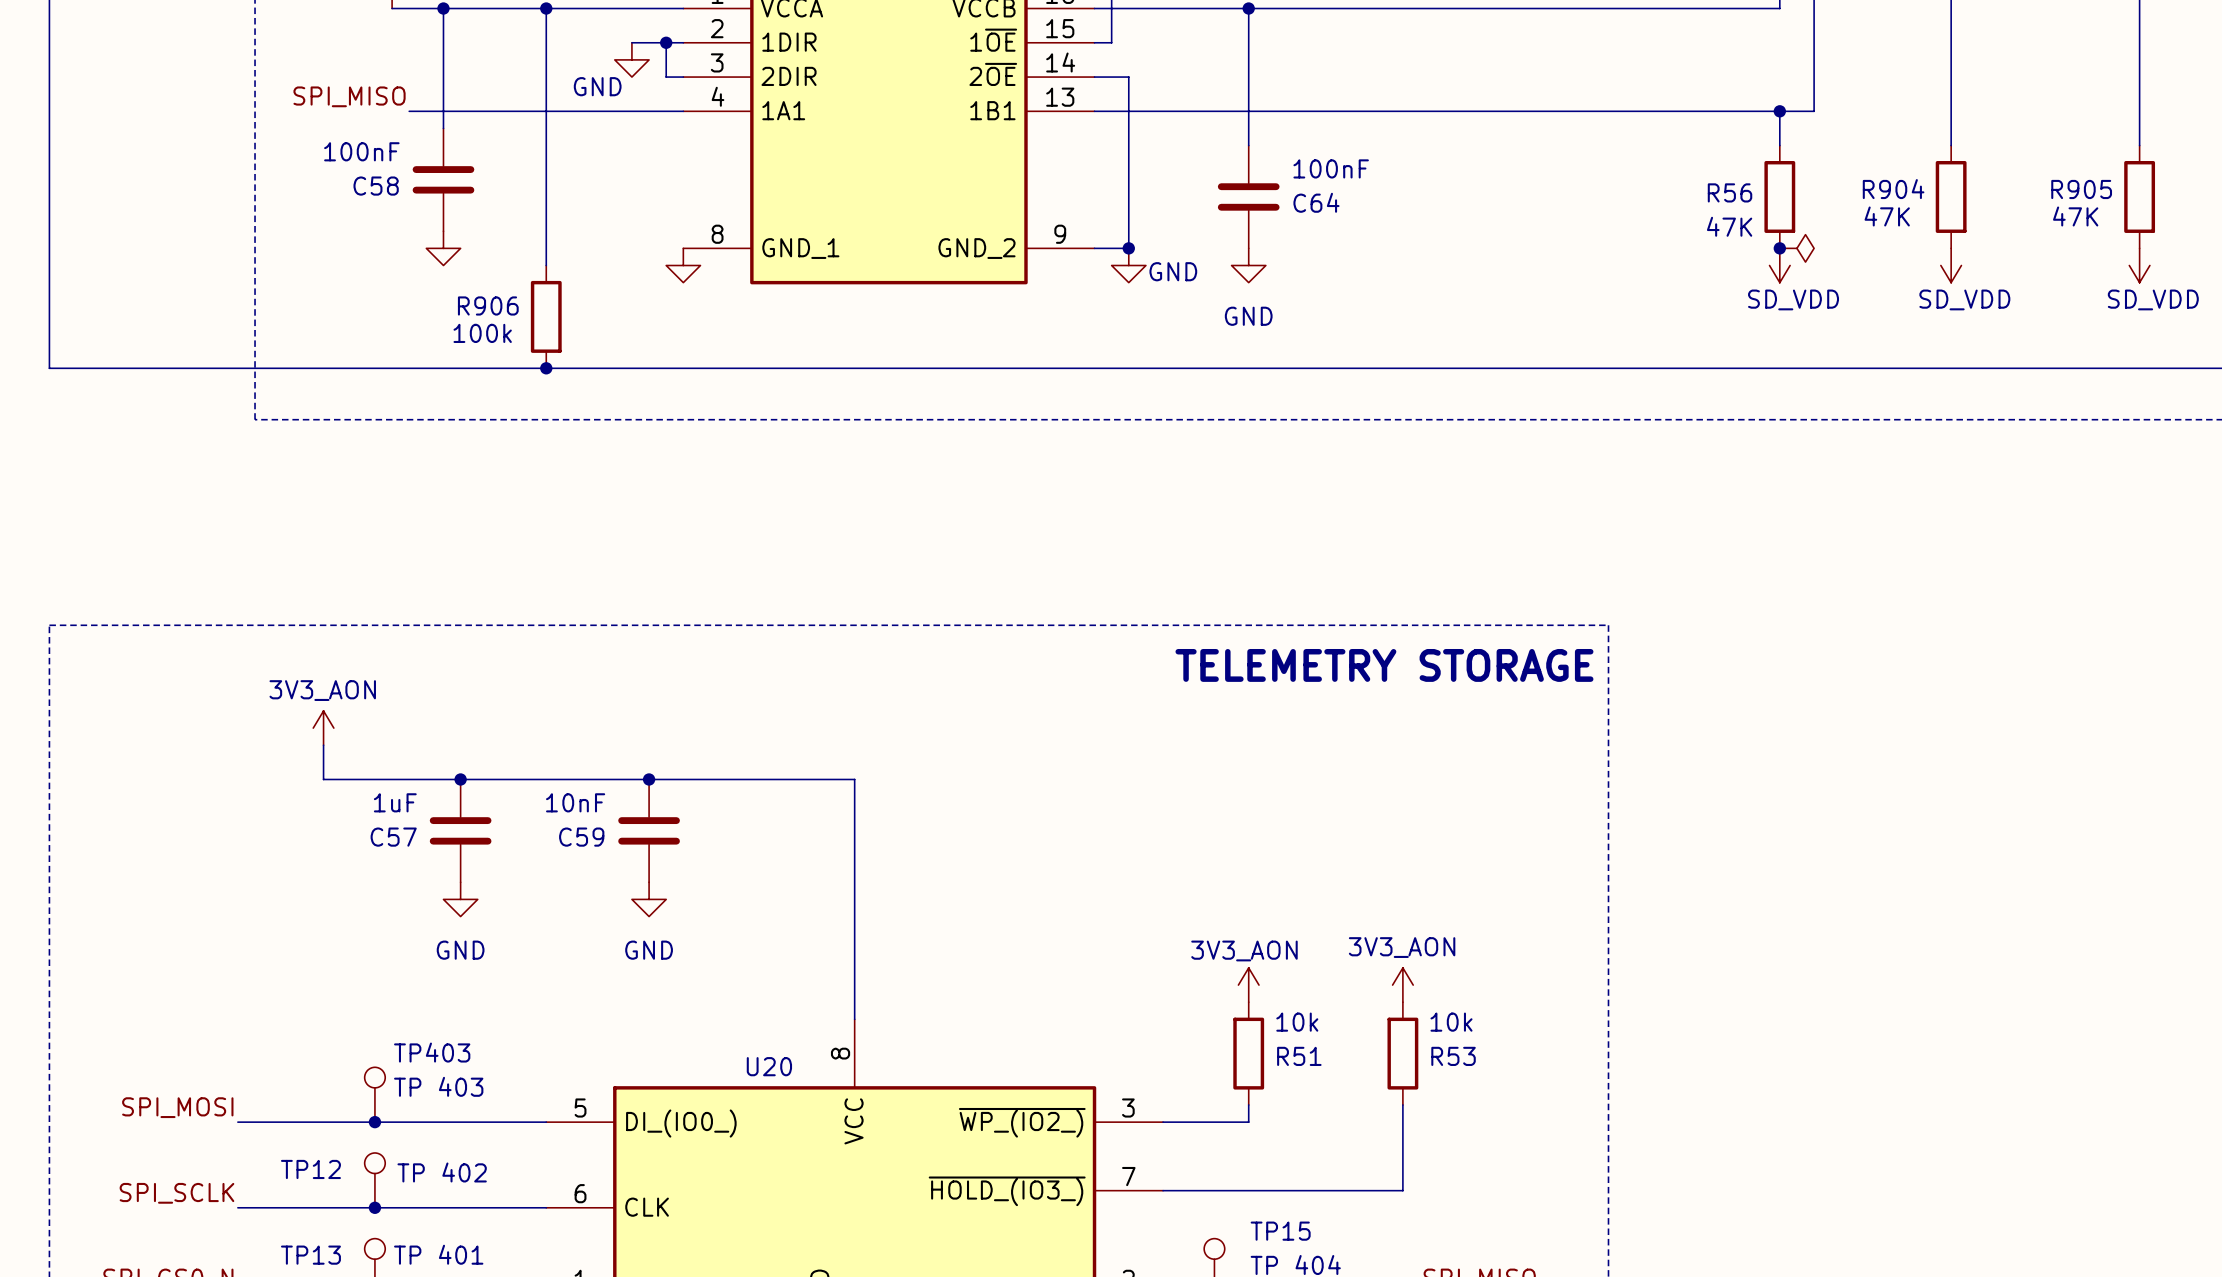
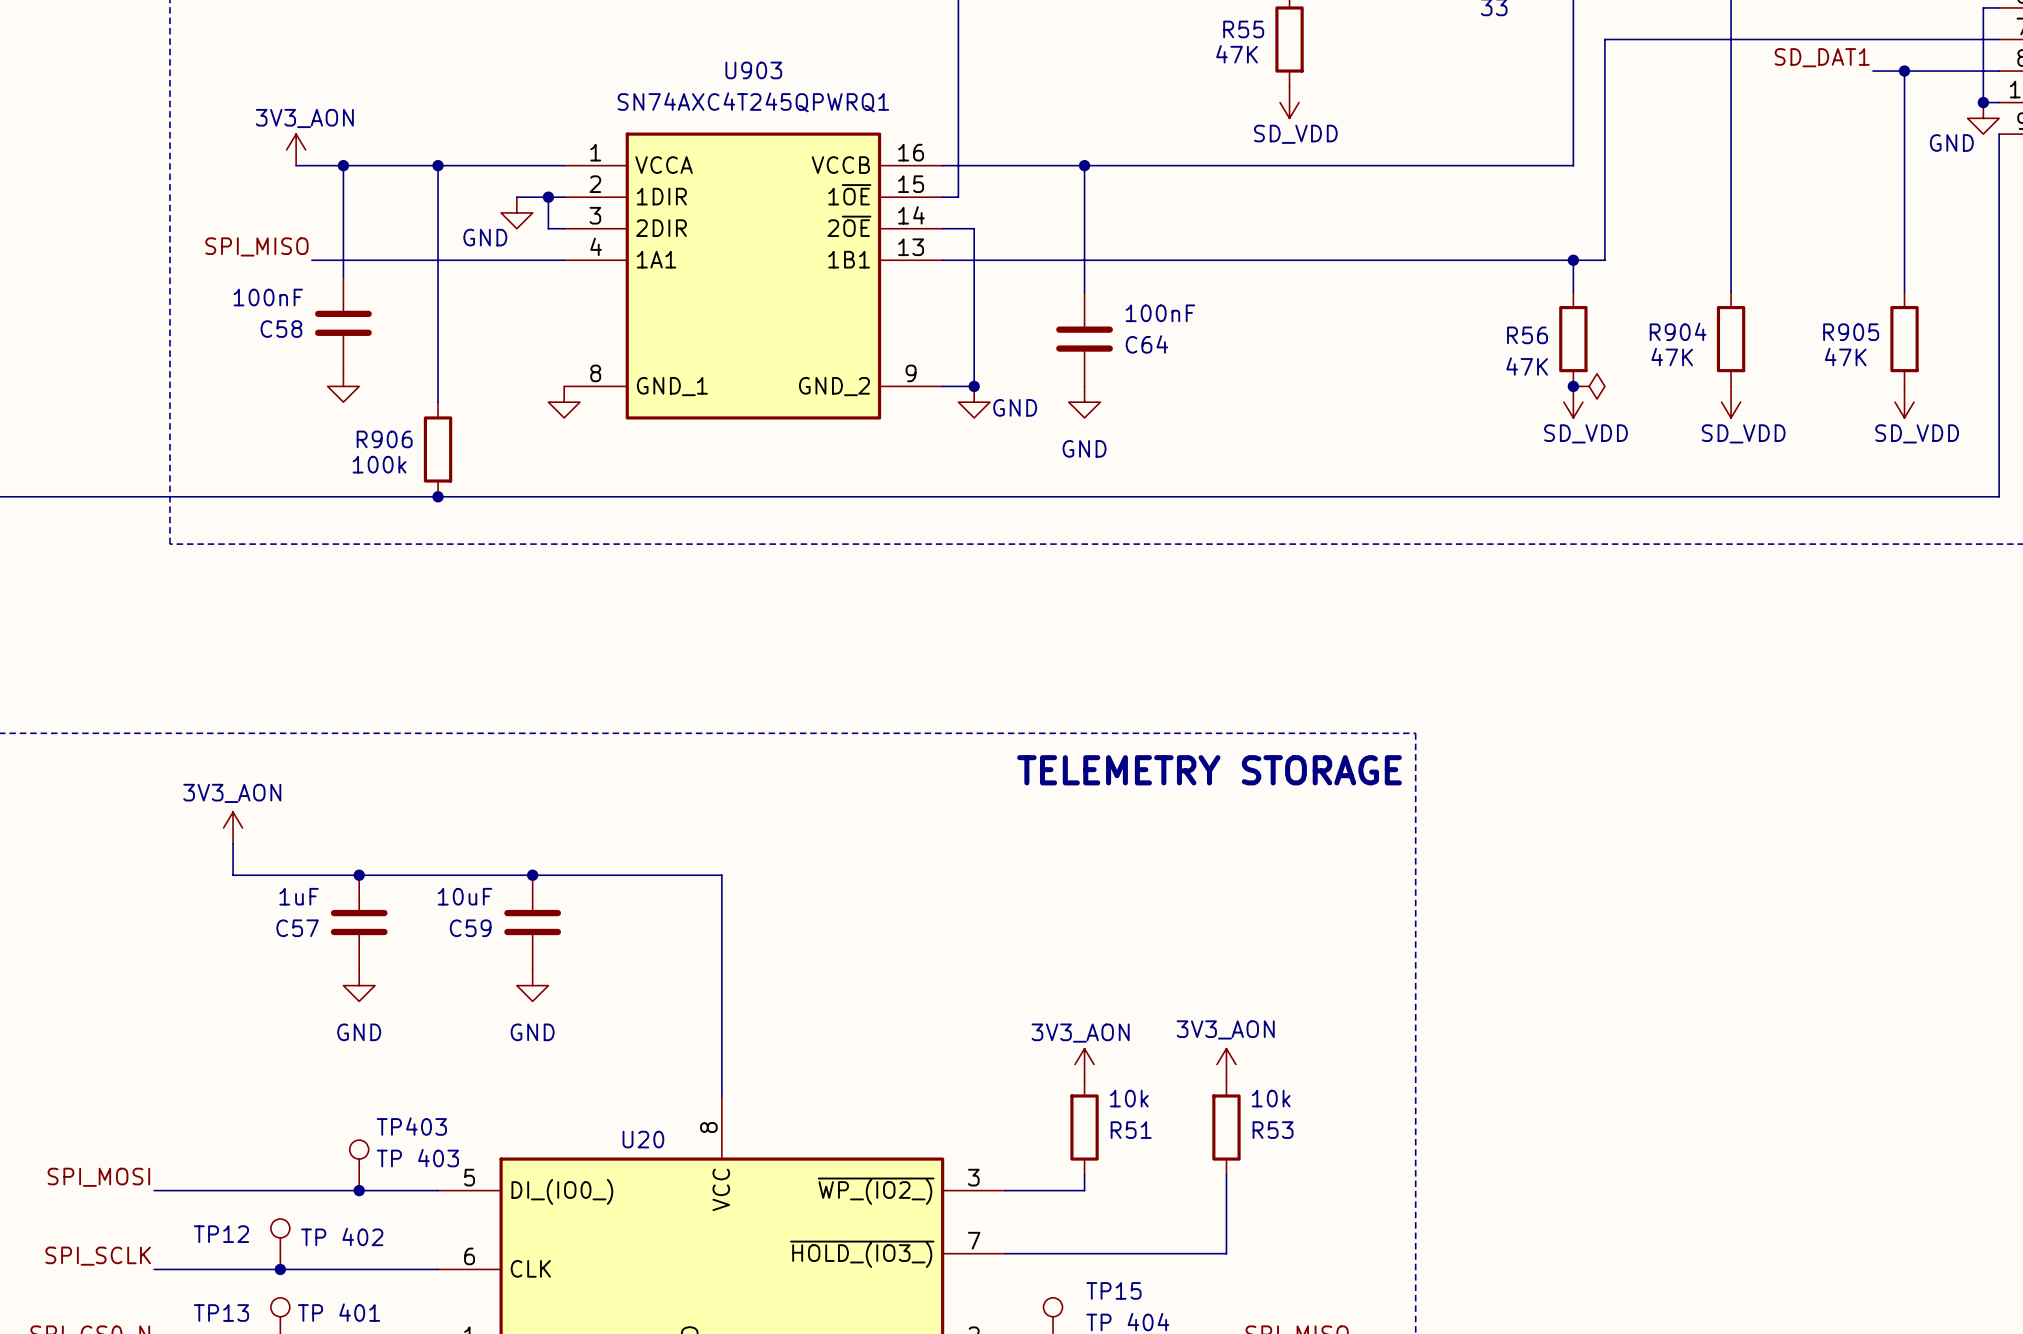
C59 value: 10nF (575, 802) -> 10uF (465, 896)
TP403 position: (374, 1094) -> (359, 1165)
junction: (374, 1122) -> none
junction: none -> (359, 1190)

